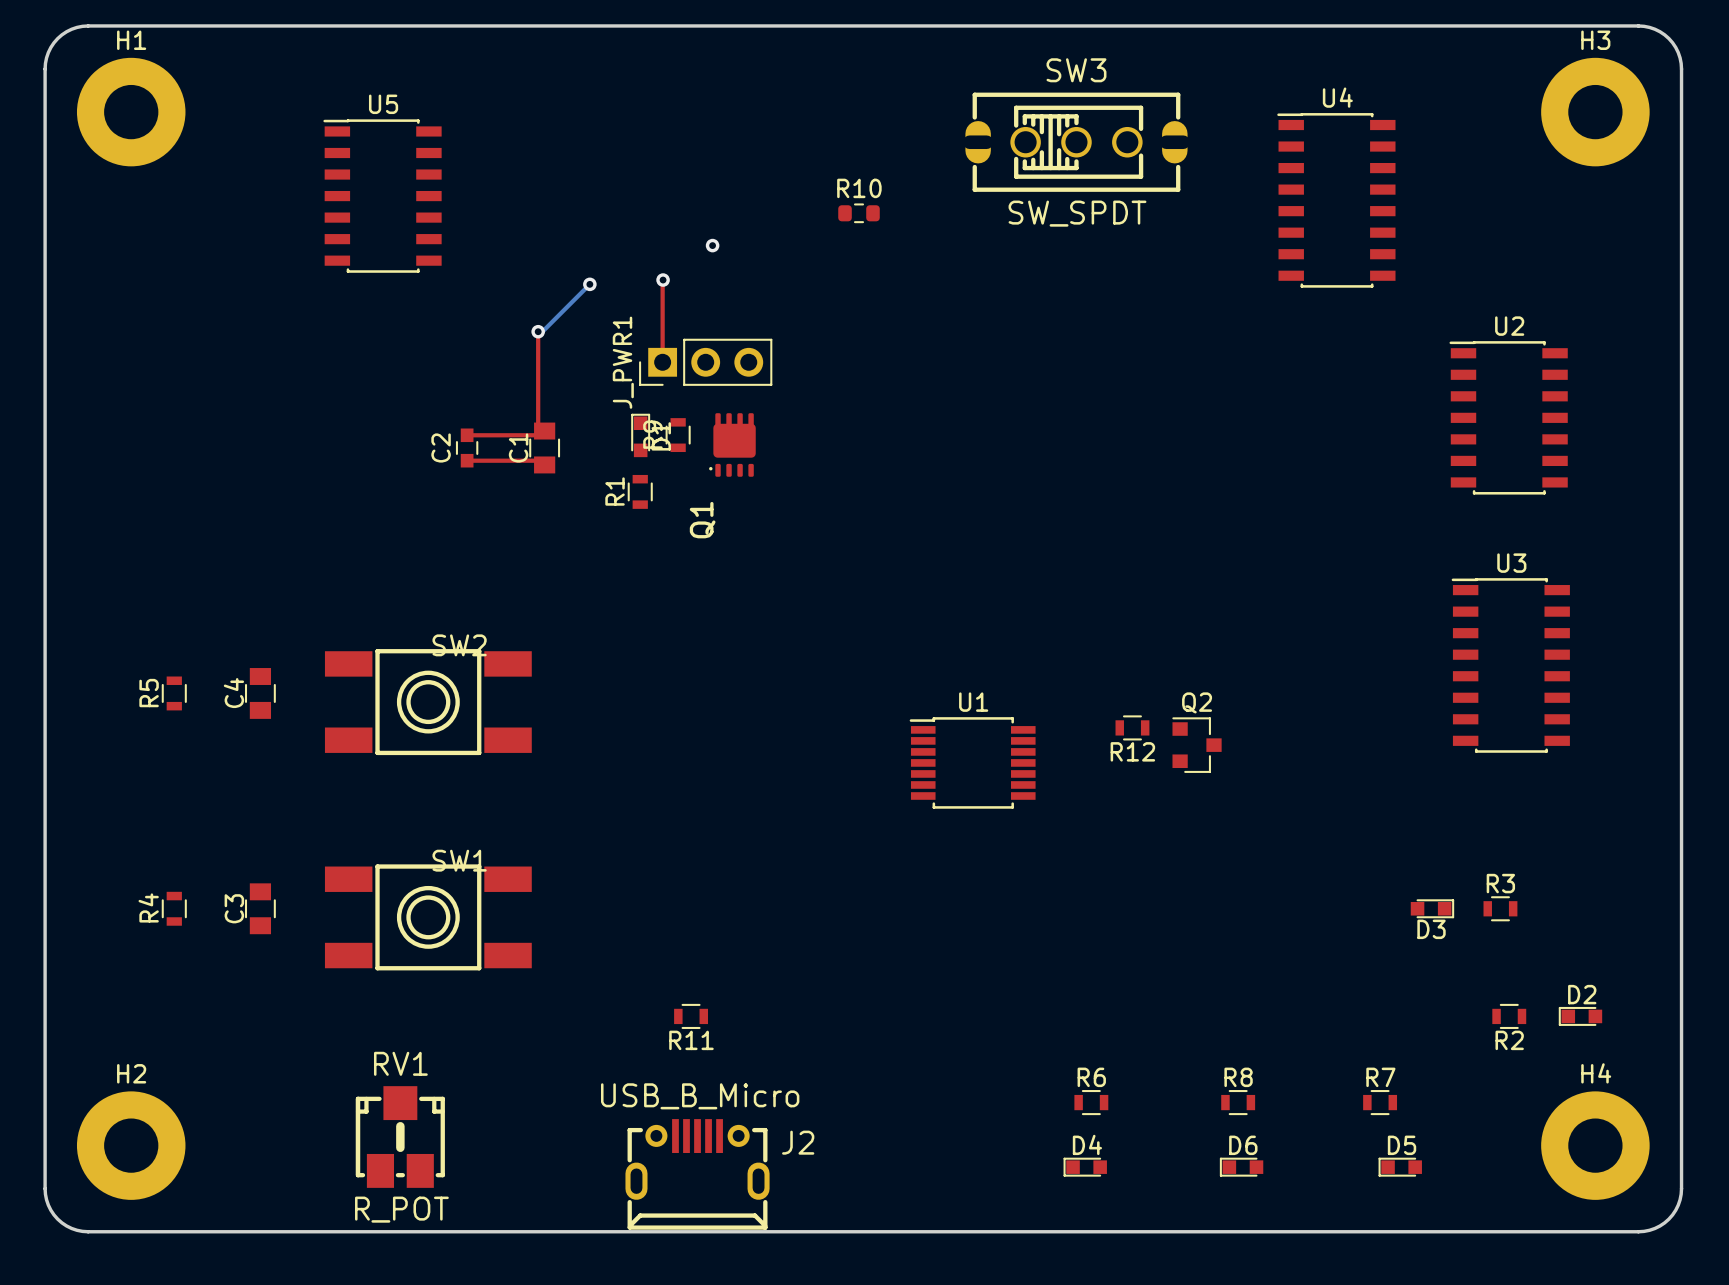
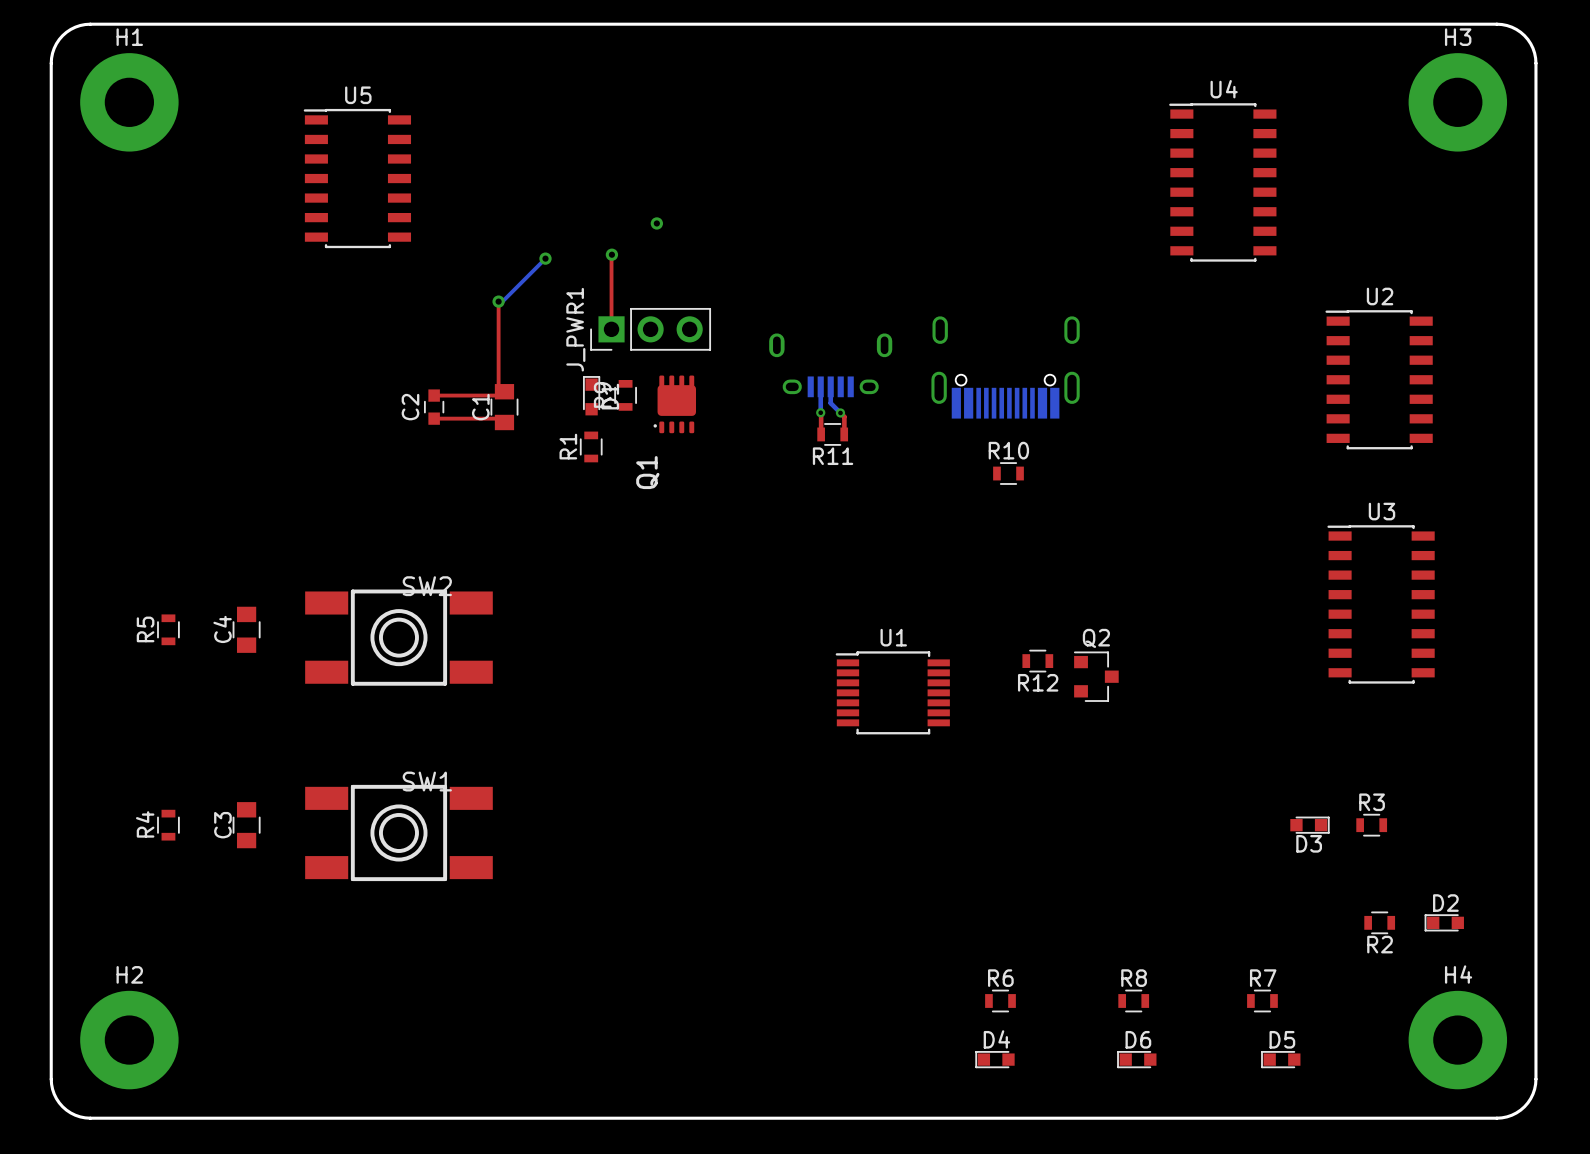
SW3: SW_SPDT (1076, 142) -> none
R10 footprint: [838, 203, 880, 224] -> [993, 462, 1024, 485]
part: none -> (830, 365)
part: none -> (1005, 367)
bottom track: none -> (820, 386) (820, 412)
bottom track: none -> (830, 386) (830, 403) (840, 412)
top track: none -> (820, 412) (821, 434)
via: none -> (820, 412)
top track: none -> (840, 412) (844, 416) (844, 434)
via: none -> (840, 412)
R11 position: (691, 1016) -> (832, 434)
RV1: R_POT (400, 1137) -> none
J2: USB_B_Micro (697, 1174) -> none

